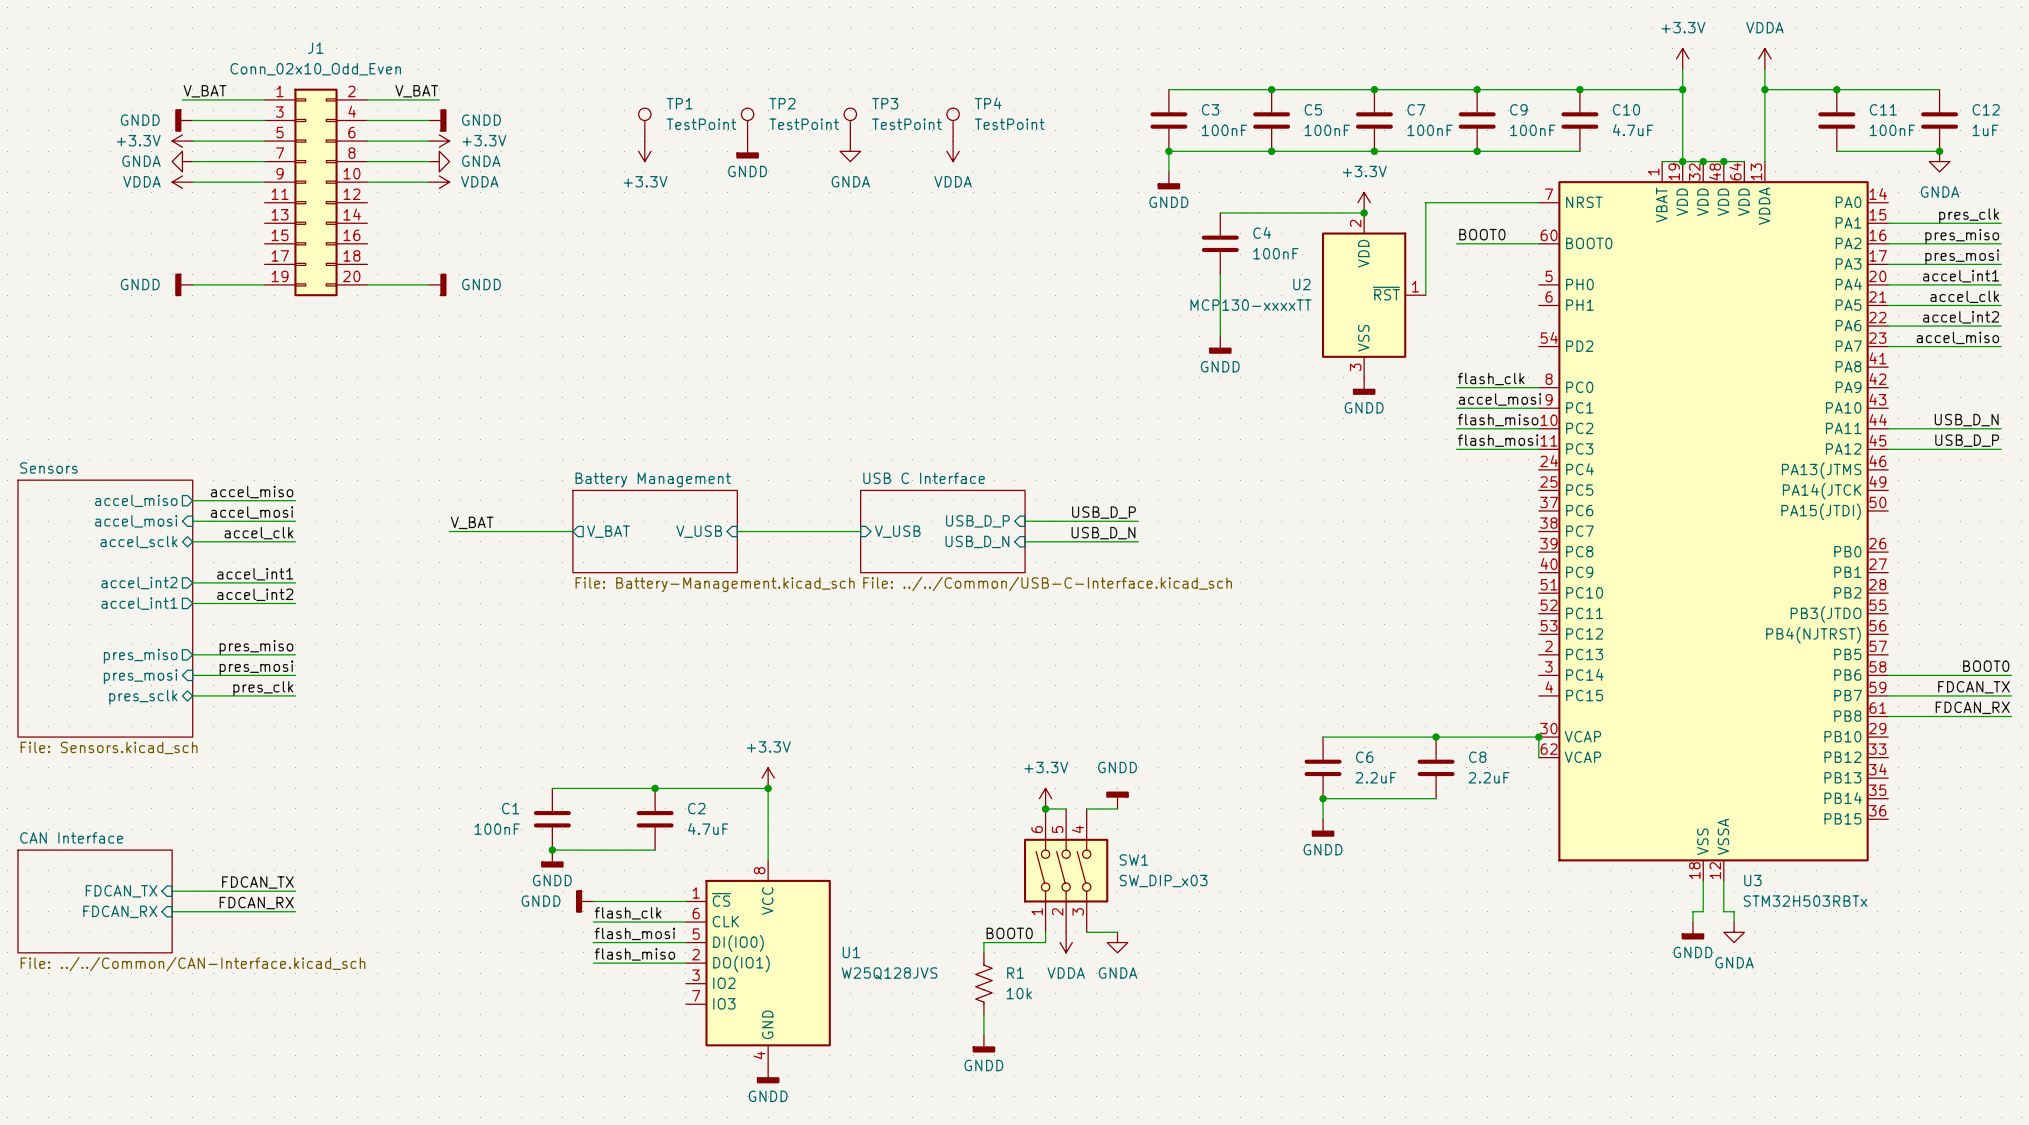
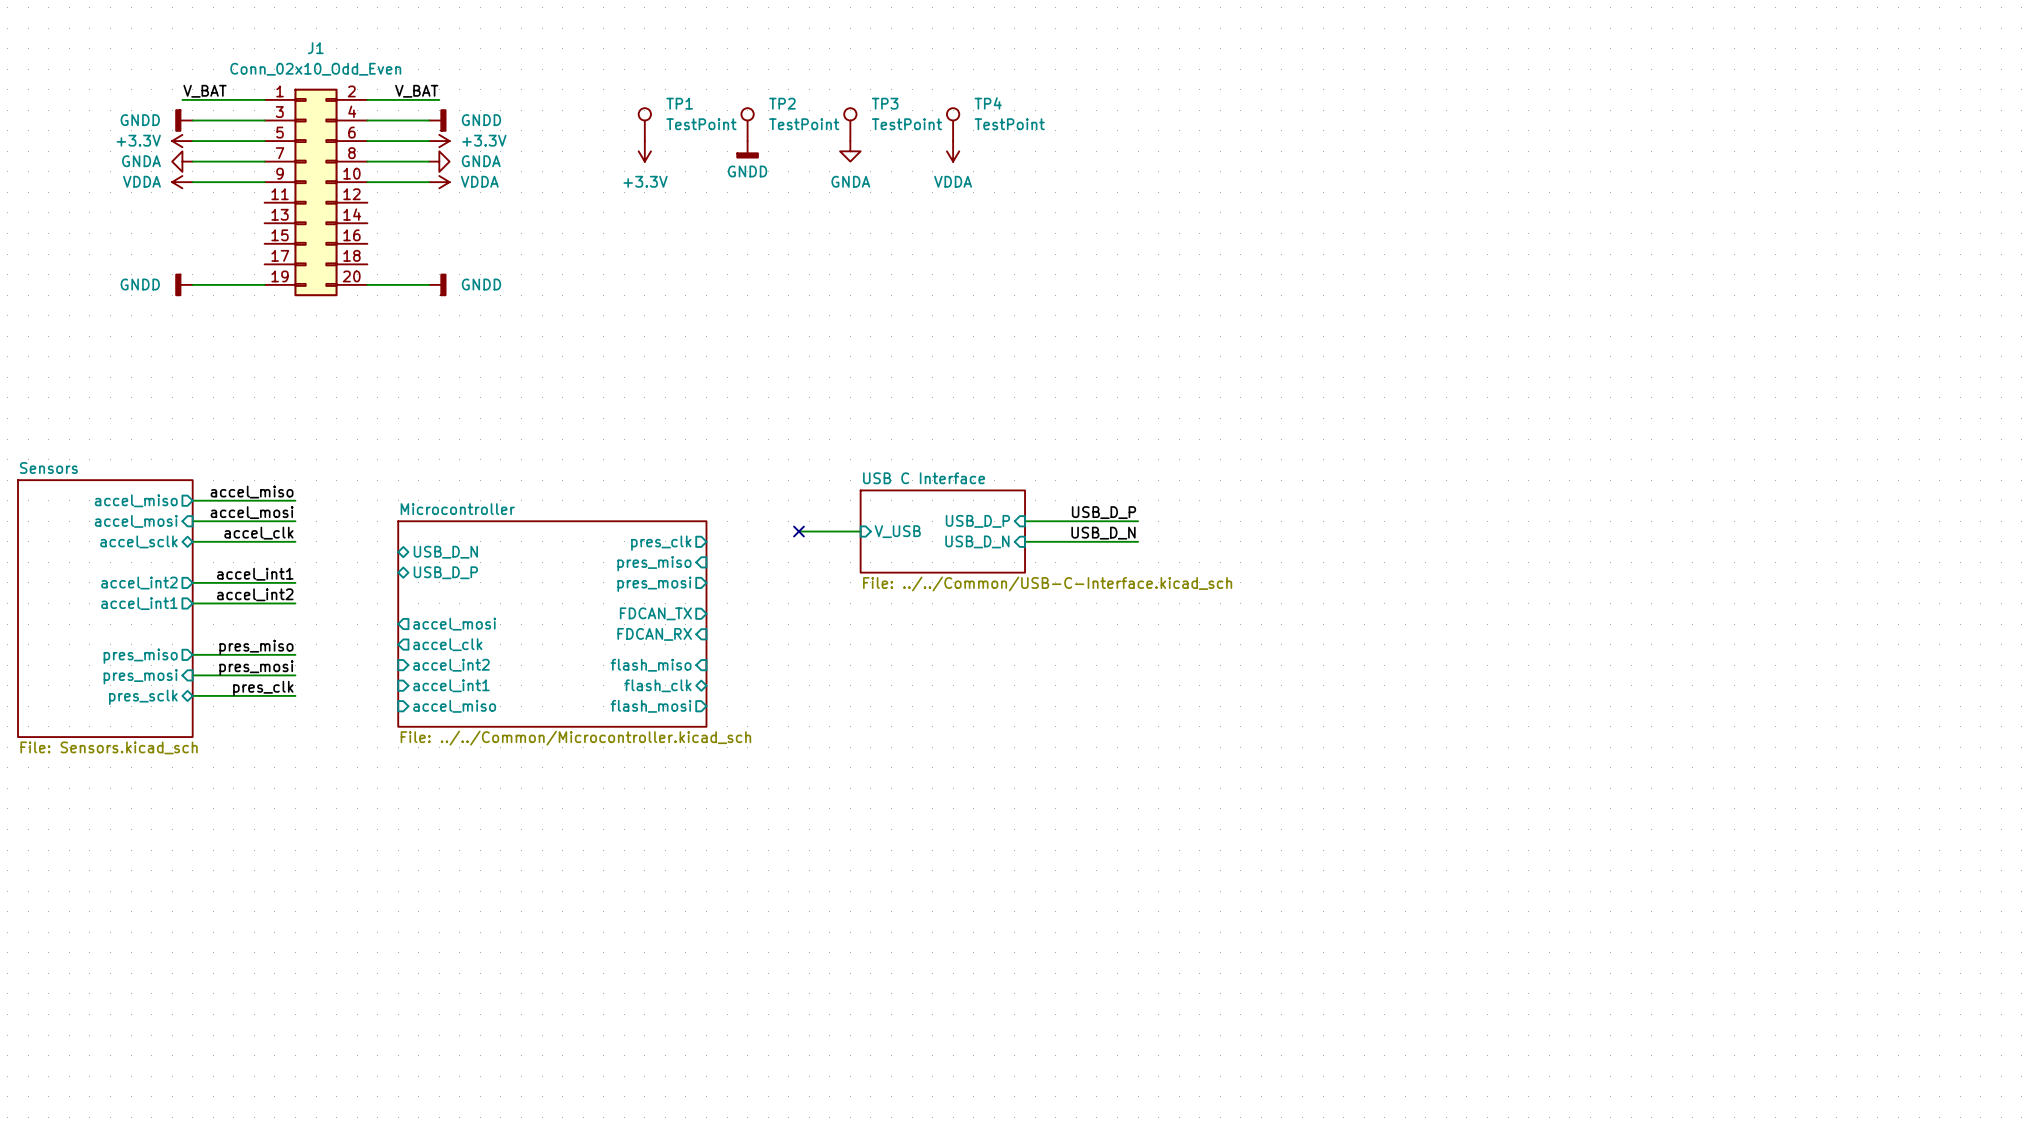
power symbol: +3.3V (1682, 58) -> none
power symbol: VDDA (1764, 58) -> none
wire: (1682, 69) (1682, 161) -> none
wire: (1764, 69) (1764, 161) -> none
wire: (1168, 89) (1682, 89) -> none
junction: (1271, 89) -> none
junction: (1374, 89) -> none
junction: (1477, 89) -> none
junction: (1579, 89) -> none
junction: (1682, 89) -> none
wire: (1764, 89) (1939, 89) -> none
junction: (1764, 89) -> none
junction: (1836, 89) -> none
C3: 100nF (1168, 120) -> none
C5: 100nF (1271, 120) -> none
C7: 100nF (1374, 120) -> none
C9: 100nF (1477, 120) -> none
C10: 4.7uF (1579, 120) -> none
C11: 100nF (1836, 120) -> none
C12: 1uF (1939, 120) -> none
junction: (1168, 151) -> none
junction: (1271, 151) -> none
junction: (1374, 151) -> none
junction: (1477, 151) -> none
wire: (1579, 151) (1168, 151) (1168, 171) -> none
wire: (1836, 151) (1939, 151) -> none
junction: (1939, 151) -> none
wire: (1662, 161) (1744, 161) -> none
junction: (1682, 161) -> none
junction: (1703, 161) -> none
junction: (1723, 161) -> none
power symbol: GNDA (1939, 161) -> none
power symbol: GNDD (1168, 180) -> none
power symbol: +3.3V (1364, 202) -> none
wire: (1538, 202) (1425, 202) (1425, 295) -> none
wire: (1220, 212) (1364, 212) -> none
junction: (1364, 212) -> none
label: pres_clk (1969, 215) -> none
wire: (1888, 223) (2001, 223) -> none
label: BOOT0 (1482, 234) -> none
label: pres_miso (1962, 236) -> none
C4: 100nF (1220, 243) -> none
wire: (1456, 243) (1538, 243) -> none
wire: (1888, 243) (2001, 243) -> none
label: pres_mosi (1962, 256) -> none
wire: (1888, 264) (2001, 264) -> none
wire: (1220, 274) (1220, 336) -> none
label: accel_int1 (1961, 276) -> none
wire: (1888, 284) (2001, 284) -> none
U2: MCP130-xxxxTT (1373, 295) -> none
label: accel_clk (1964, 296) -> none
wire: (1888, 305) (2001, 305) -> none
label: accel_int2 (1961, 317) -> none
wire: (1888, 326) (2001, 326) -> none
label: accel_miso (1957, 337) -> none
power symbol: GNDD (1220, 345) -> none
wire: (1888, 346) (2001, 346) -> none
label: flash_clk (1491, 378) -> none
power symbol: GNDD (1364, 386) -> none
wire: (1456, 387) (1538, 387) -> none
label: accel_mosi (1500, 399) -> none
wire: (1456, 408) (1538, 408) -> none
label: flash_miso (1498, 420) -> none
label: USB_D_N (1966, 420) -> none
wire: (1456, 428) (1538, 428) -> none
wire: (1888, 428) (2001, 428) -> none
label: flash_mosi (1498, 440) -> none
label: USB_D_P (1967, 440) -> none
wire: (1456, 449) (1538, 449) -> none
wire: (1888, 449) (2001, 449) -> none
U3: STM32H503RBTx (1713, 521) -> none
label: V_BAT (472, 522) -> none
wire: (449, 531) (572, 531) -> none
sheet pin: V_BAT (608, 531) -> none
sheet Battery Management: File: Battery-Management.kicad_sch (655, 531) -> none
sheet pin: V_USB (699, 531) -> none
wire: (737, 531) (798, 531) -> none
no-connect mark: none -> (798, 531)
sheet pin: none -> pres_clk (661, 543)
sheet pin: none -> USB_D_N (445, 552)
sheet pin: none -> pres_miso (654, 563)
sheet pin: none -> USB_D_P (445, 572)
sheet pin: none -> pres_mosi (654, 584)
sheet pin: none -> FDCAN_TX (655, 613)
sheet pin: none -> accel_mosi (454, 624)
sheet Microcontroller: none -> File: ../../Common/Microcontroller.kicad_sch (552, 624)
sheet pin: none -> FDCAN_RX (654, 634)
sheet pin: none -> accel_clk (447, 644)
sheet pin: none -> accel_int2 (451, 665)
sheet pin: none -> flash_miso (651, 665)
label: BOOT0 (1986, 666) -> none
wire: (1888, 675) (2011, 675) -> none
sheet pin: none -> accel_int1 (451, 685)
sheet pin: none -> flash_clk (657, 685)
label: FDCAN_TX (1974, 687) -> none
wire: (1888, 695) (2011, 695) -> none
sheet pin: none -> accel_miso (454, 706)
sheet pin: none -> flash_mosi (651, 706)
label: FDCAN_RX (1972, 707) -> none
wire: (1888, 716) (2011, 716) -> none
wire: (1323, 737) (1538, 737) (1538, 757) -> none
junction: (1436, 737) -> none
junction: (1538, 737) -> none
C6: 2.2uF (1323, 767) -> none
C8: 2.2uF (1436, 767) -> none
power symbol: +3.3V (768, 778) -> none
wire: (552, 788) (768, 788) (768, 860) -> none
junction: (655, 788) -> none
junction: (768, 788) -> none
power symbol: +3.3V (1045, 798) -> none
junction: (1323, 798) -> none
wire: (1436, 798) (1323, 798) (1323, 819) -> none
power symbol: GNDD (1117, 800) -> none
wire: (1045, 808) (1066, 808) -> none
junction: (1045, 808) -> none
wire: (1086, 808) (1117, 808) -> none
C1: 100nF (552, 819) -> none
C2: 4.7uF (655, 819) -> none
power symbol: GNDD (1323, 827) -> none
wire: (552, 850) (655, 850) -> none
junction: (552, 850) -> none
power symbol: GNDD (552, 858) -> none
SW1: SW_DIP_x03 (1066, 870) -> none
wire: (1703, 880) (1703, 911) (1692, 911) (1692, 922) -> none
wire: (1723, 880) (1723, 911) (1734, 911) (1734, 922) -> none
label: FDCAN_TX (257, 882) -> none
sheet pin: FDCAN_TX (121, 891) -> none
wire: (172, 891) (295, 891) -> none
sheet CAN Interface: File: ../../Common/CAN-Interface.kicad_sch (95, 901) -> none
power symbol: GNDD (584, 901) -> none
wire: (593, 901) (685, 901) -> none
label: FDCAN_RX (256, 903) -> none
sheet pin: FDCAN_RX (120, 911) -> none
wire: (172, 911) (295, 911) -> none
label: flash_clk (628, 913) -> none
wire: (593, 922) (685, 922) -> none
power symbol: GNDD (1692, 930) -> none
wire: (1045, 932) (1045, 942) (983, 942) (983, 952) -> none
wire: (1086, 932) (1117, 932) -> none
power symbol: GNDA (1734, 932) -> none
label: flash_mosi (634, 933) -> none
label: BOOT0 (1009, 933) -> none
wire: (593, 942) (685, 942) -> none
power symbol: VDDA (1066, 942) -> none
power symbol: GNDA (1117, 942) -> none
label: flash_miso (634, 954) -> none
wire: (593, 963) (685, 963) -> none
U1: W25Q128JVS (758, 963) -> none
R1: 10k (983, 983) -> none
wire: (983, 1014) (983, 1035) -> none
power symbol: GNDD (983, 1043) -> none
power symbol: GNDD (768, 1074) -> none

